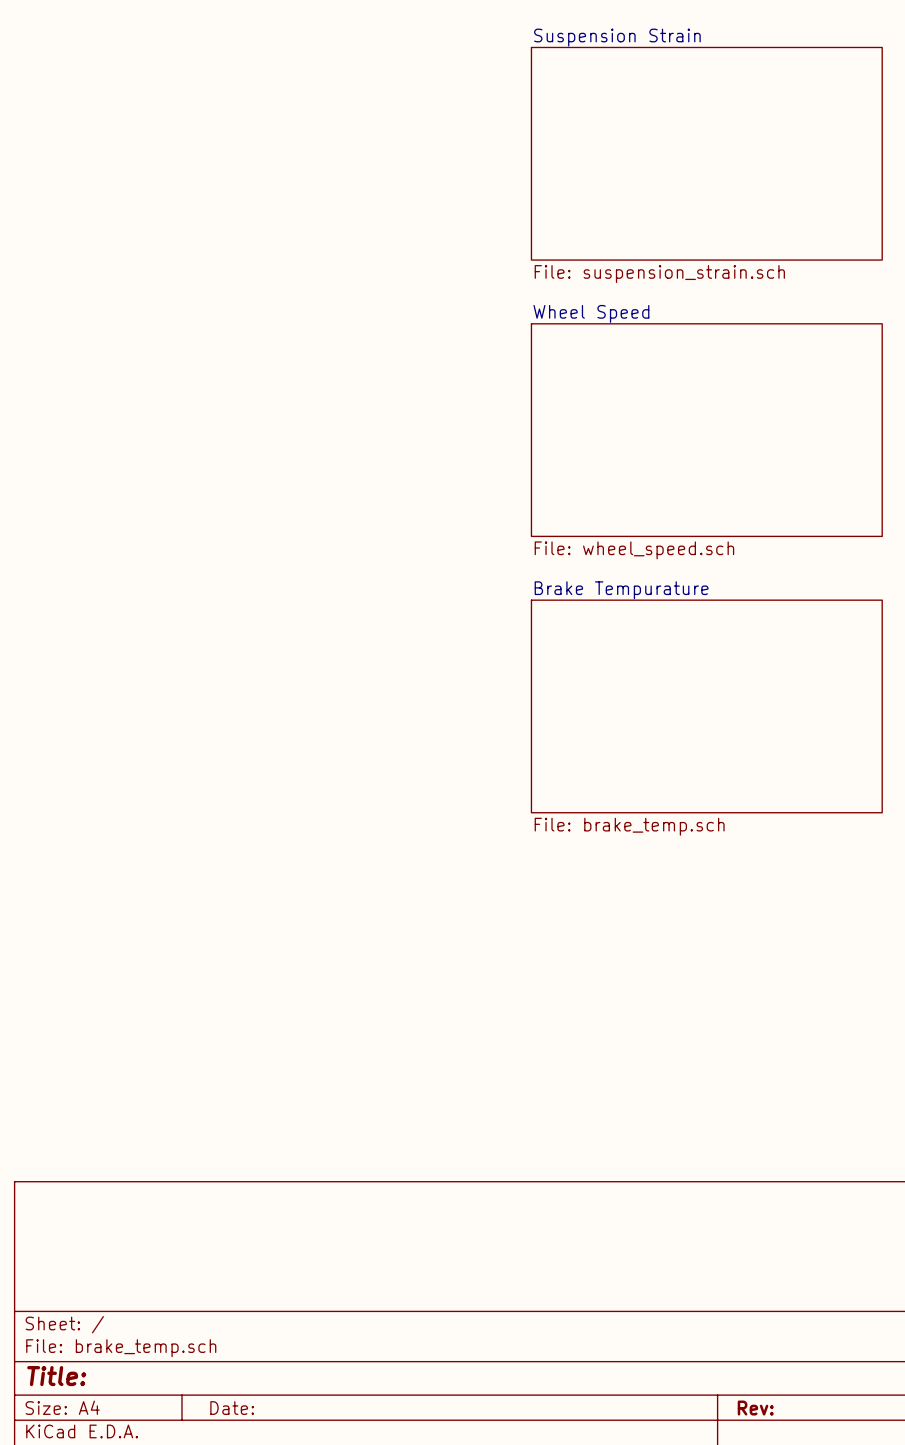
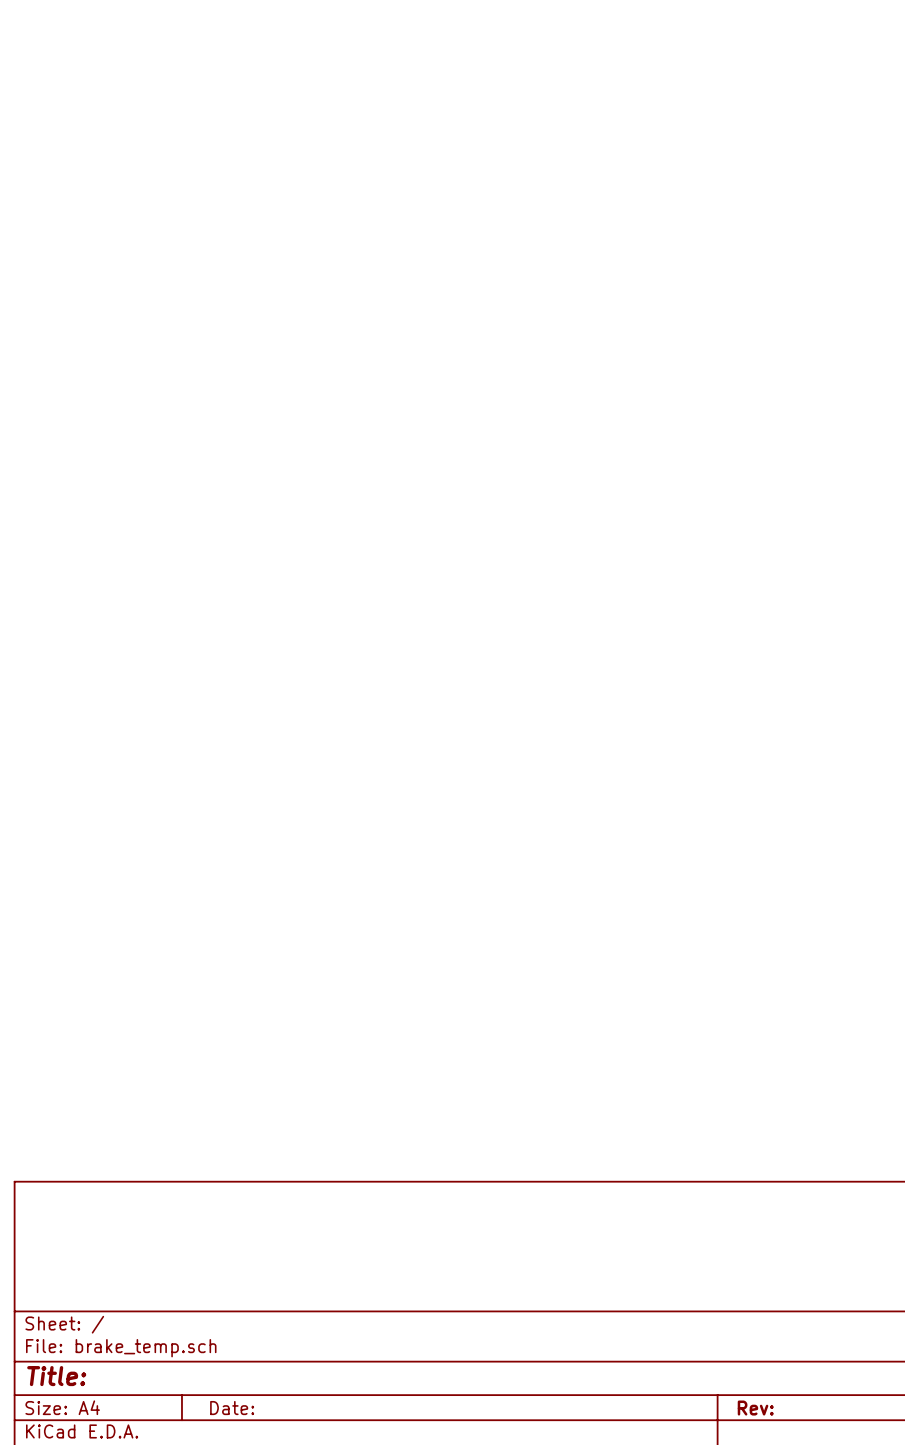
sheet Suspension Strain: File: suspension_strain.sch (706, 153) -> none
sheet Wheel Speed: File: wheel_speed.sch (706, 430) -> none
sheet Brake Tempurature: File: brake_temp.sch (706, 706) -> none

